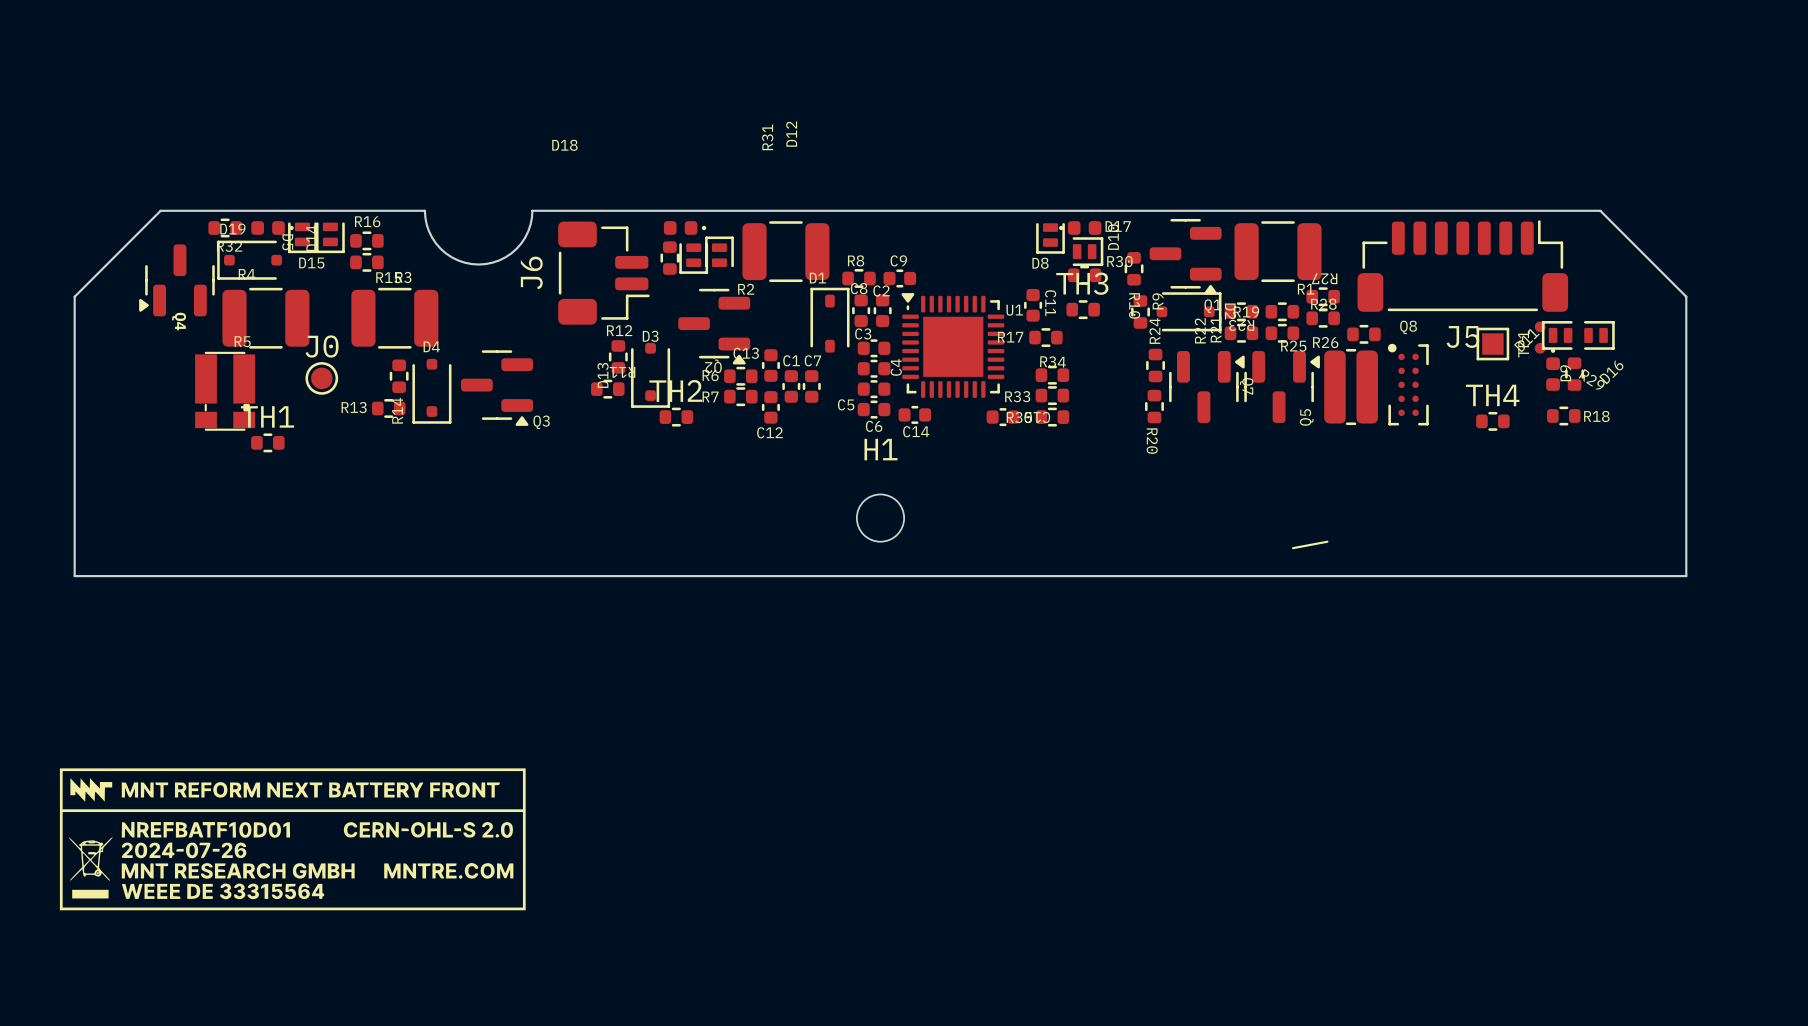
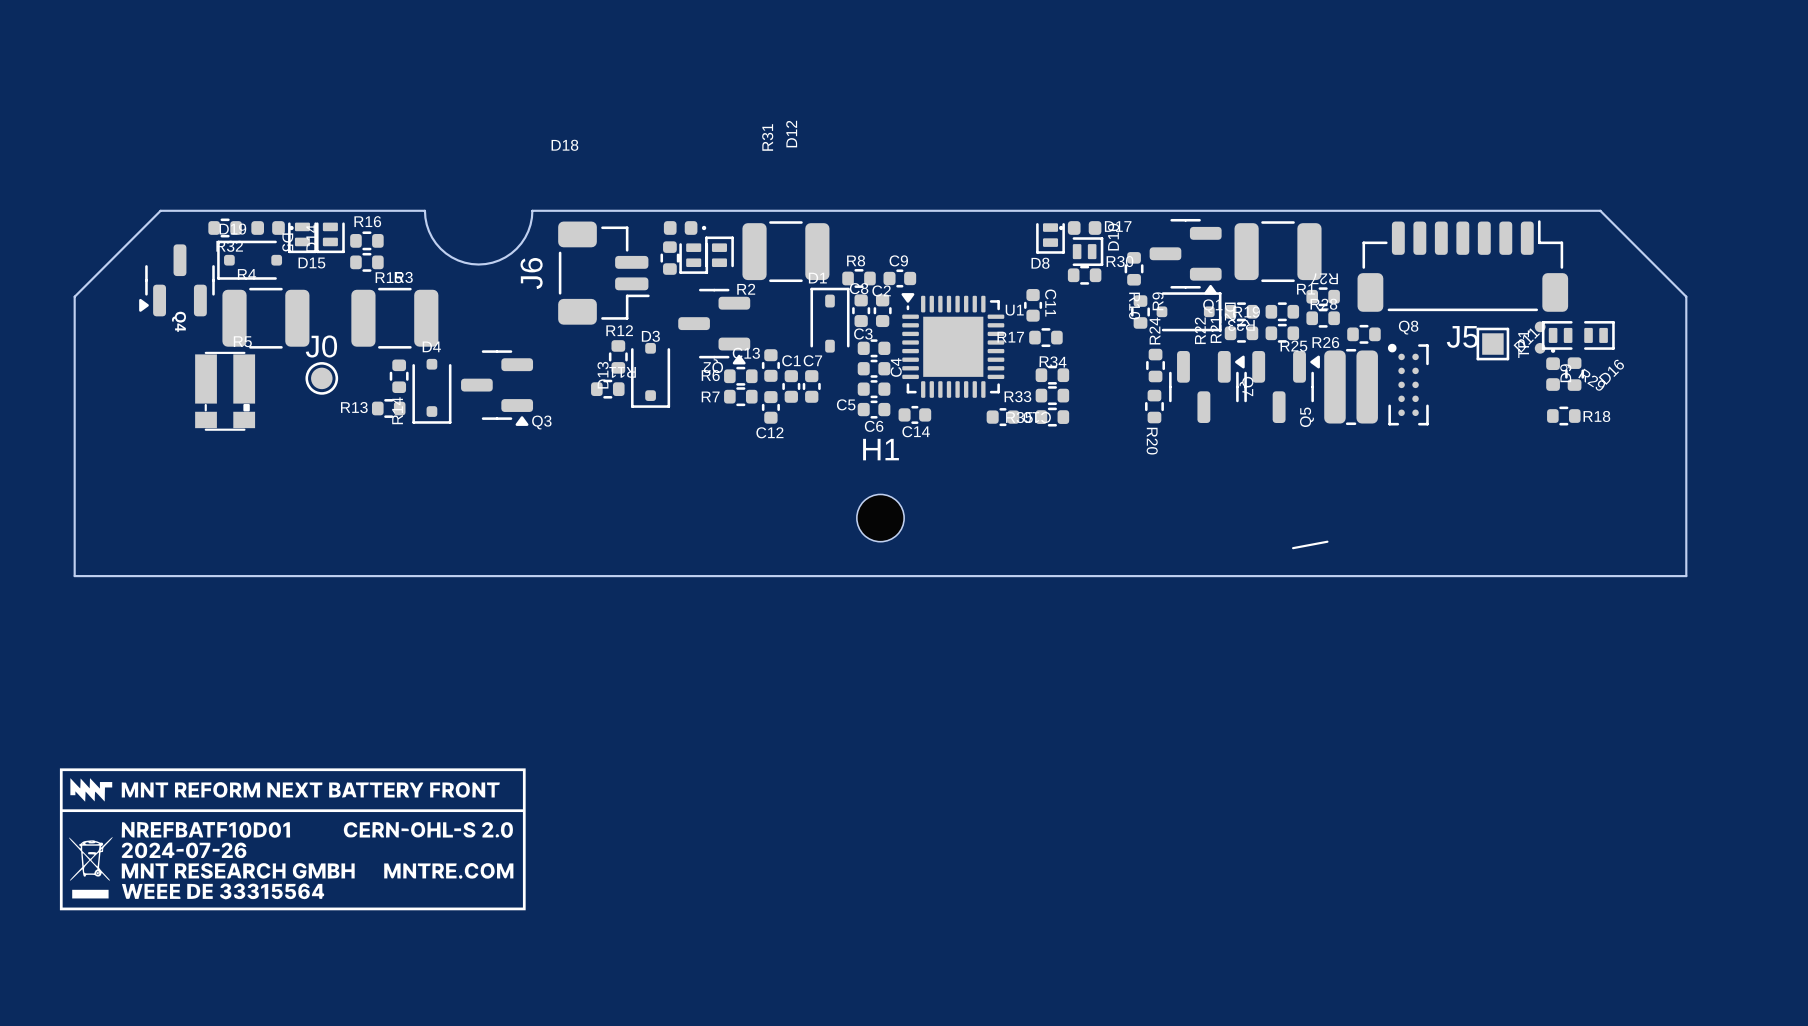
TH3: (1083, 309) -> none
TH2: (676, 417) -> none
TH4: (1492, 421) -> none
TH1: (267, 442) -> none

